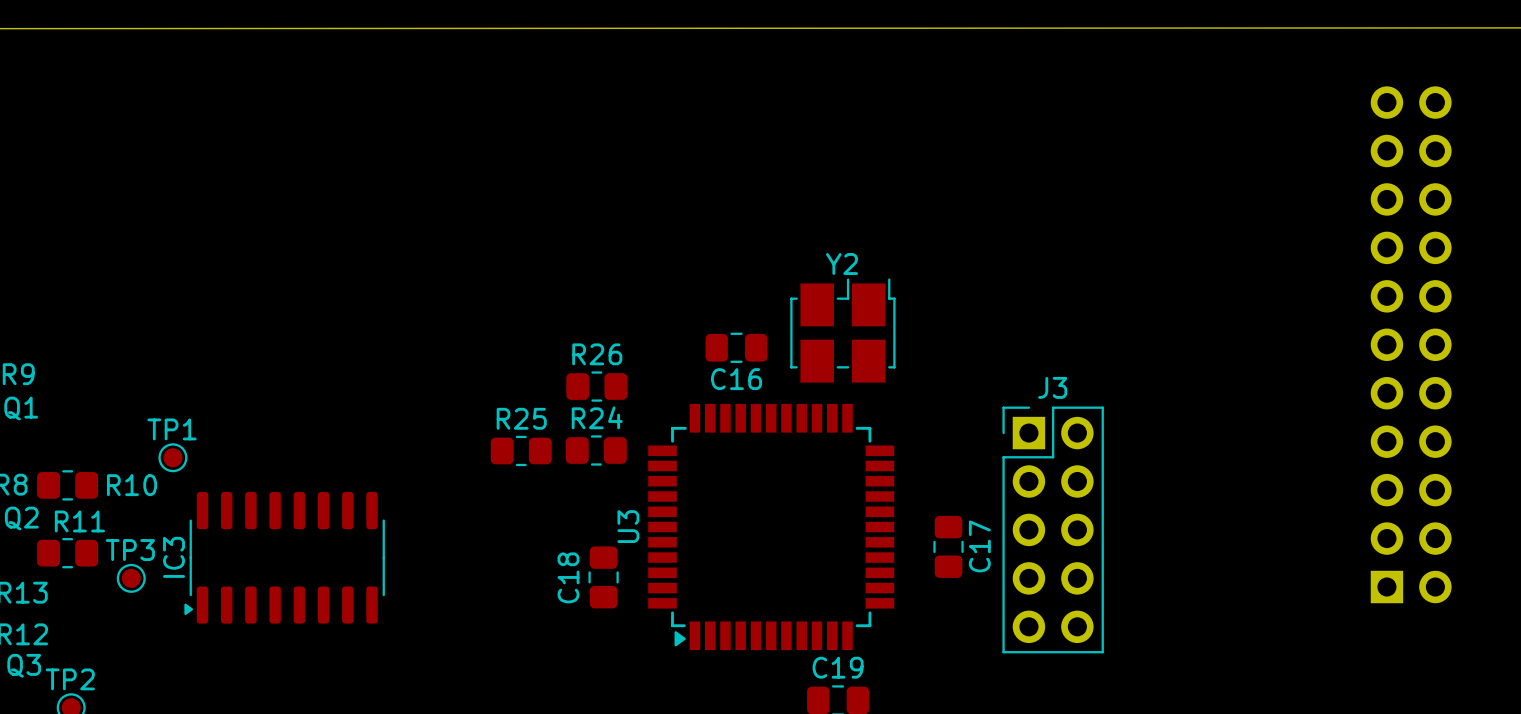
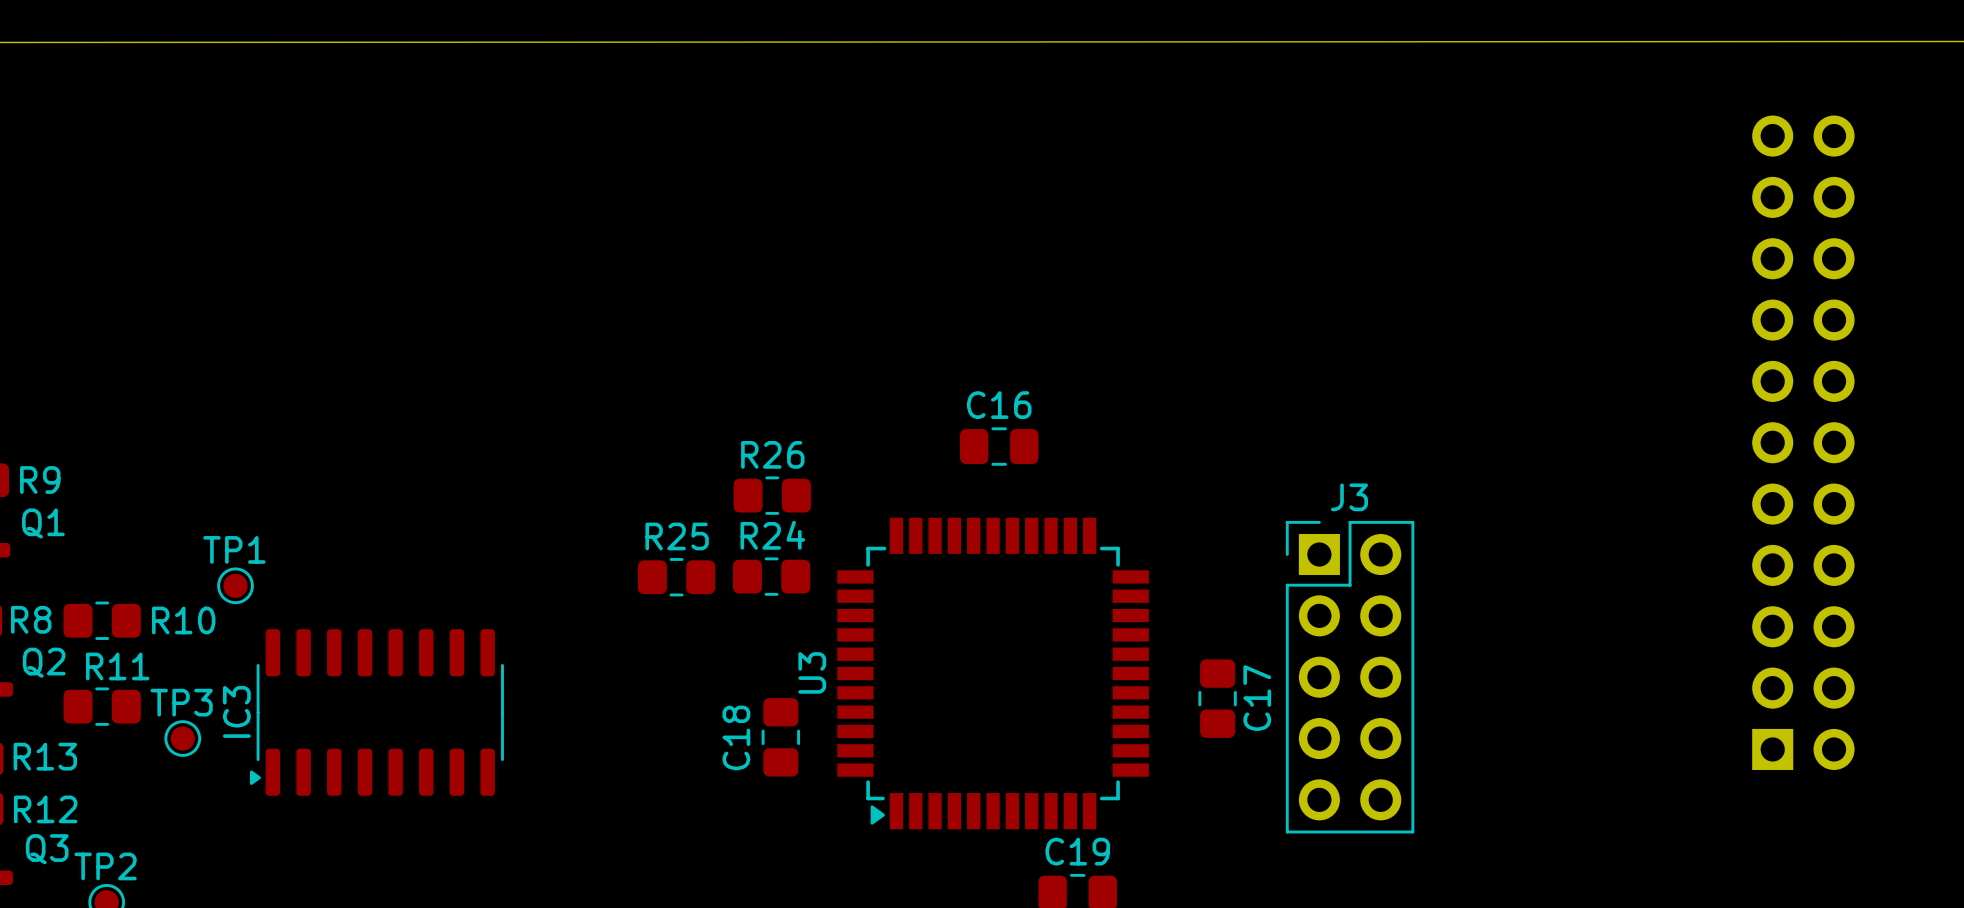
Y2: (842, 330) -> none
C16 position: (736, 347) -> (999, 446)
C16 name position: C16 (736, 379) -> C16 (999, 405)

